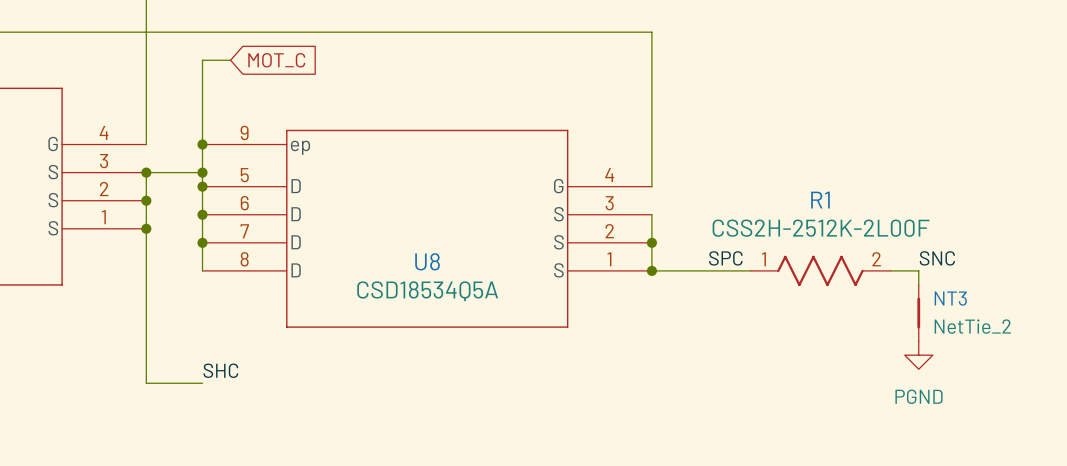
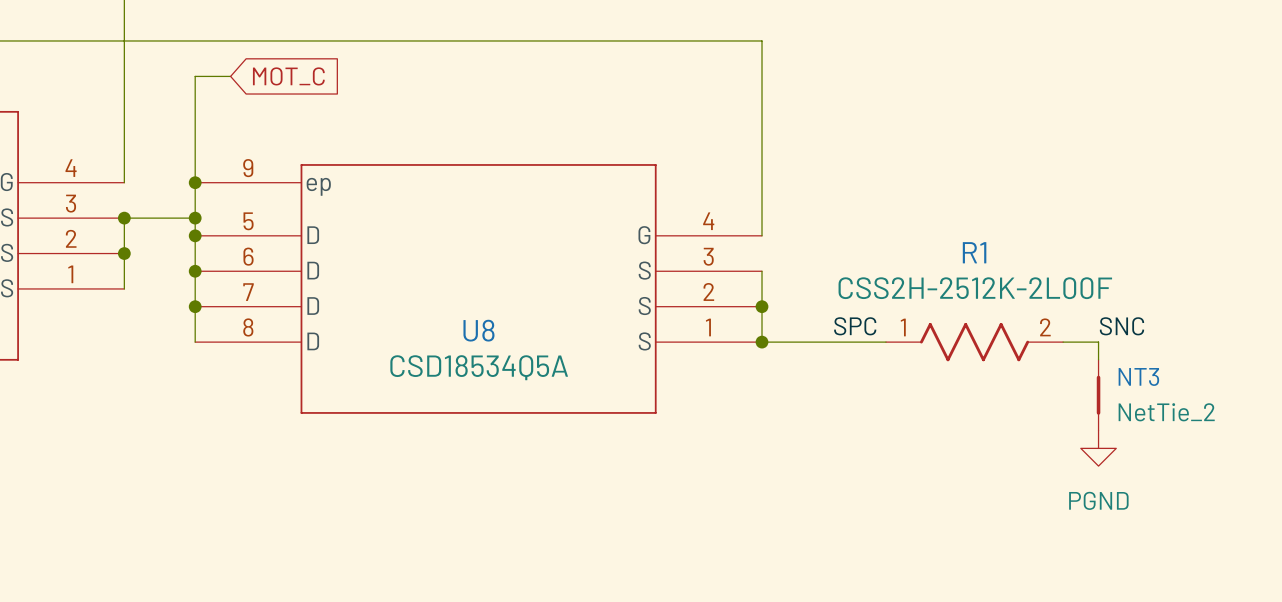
wire: (146, 228) (146, 383) (202, 383) -> none
junction: (146, 228) -> none
label: SHC (220, 370) -> none

